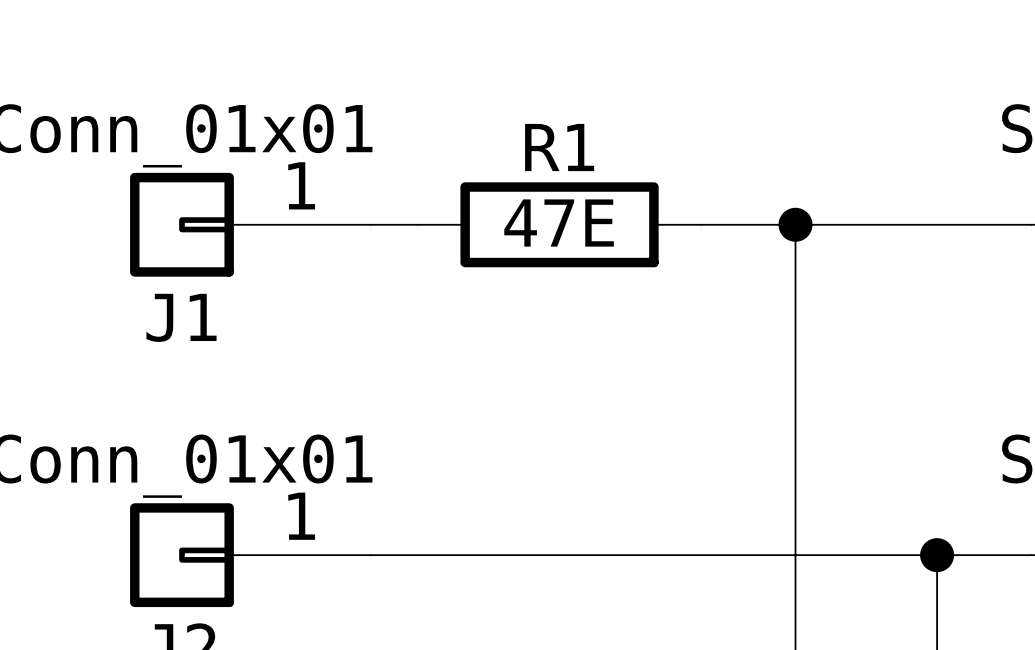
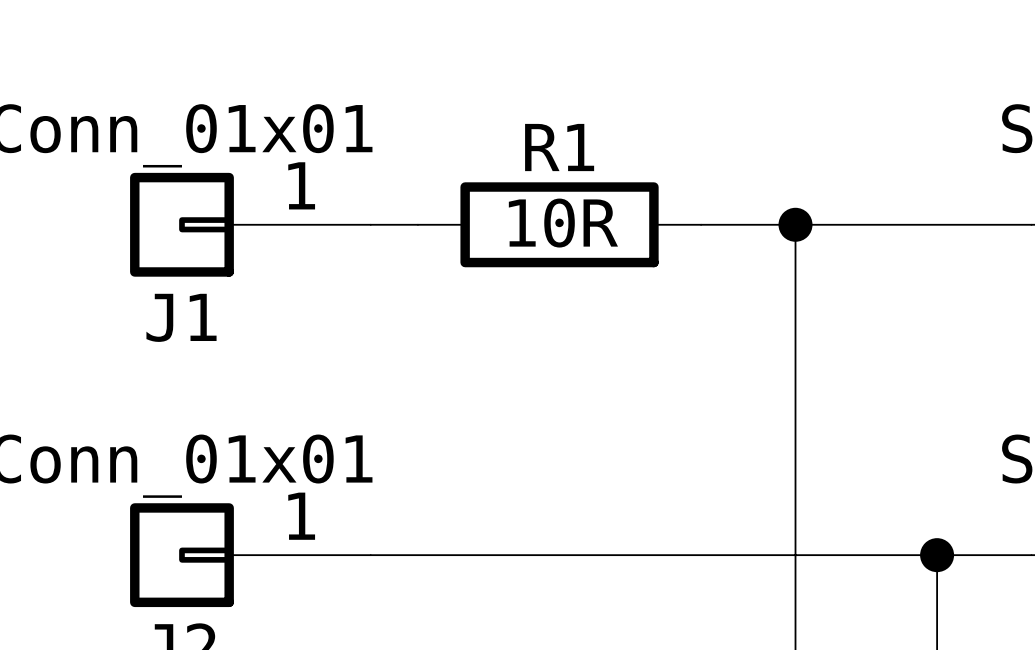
R1 value: 47E (559, 223) -> 10R (563, 223)

